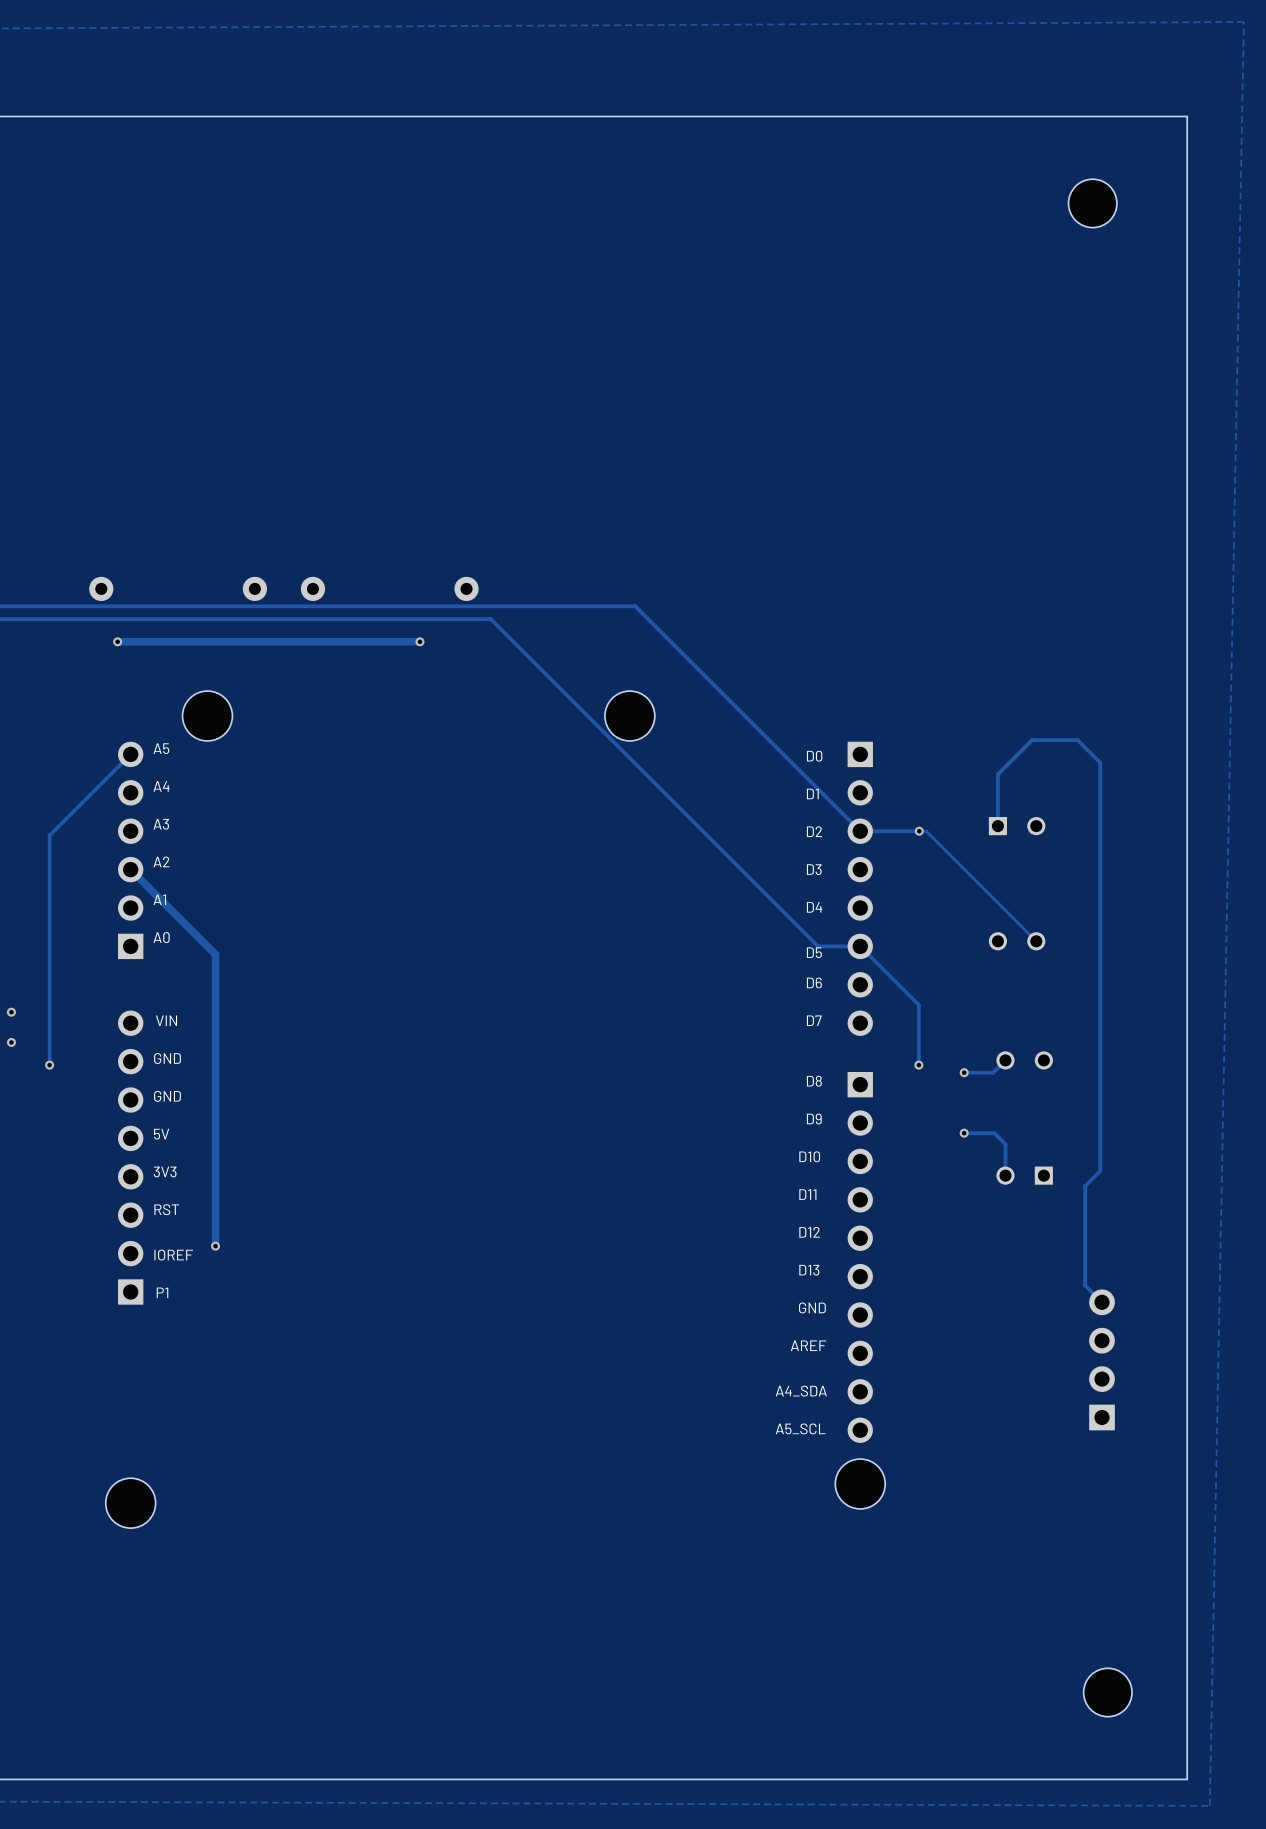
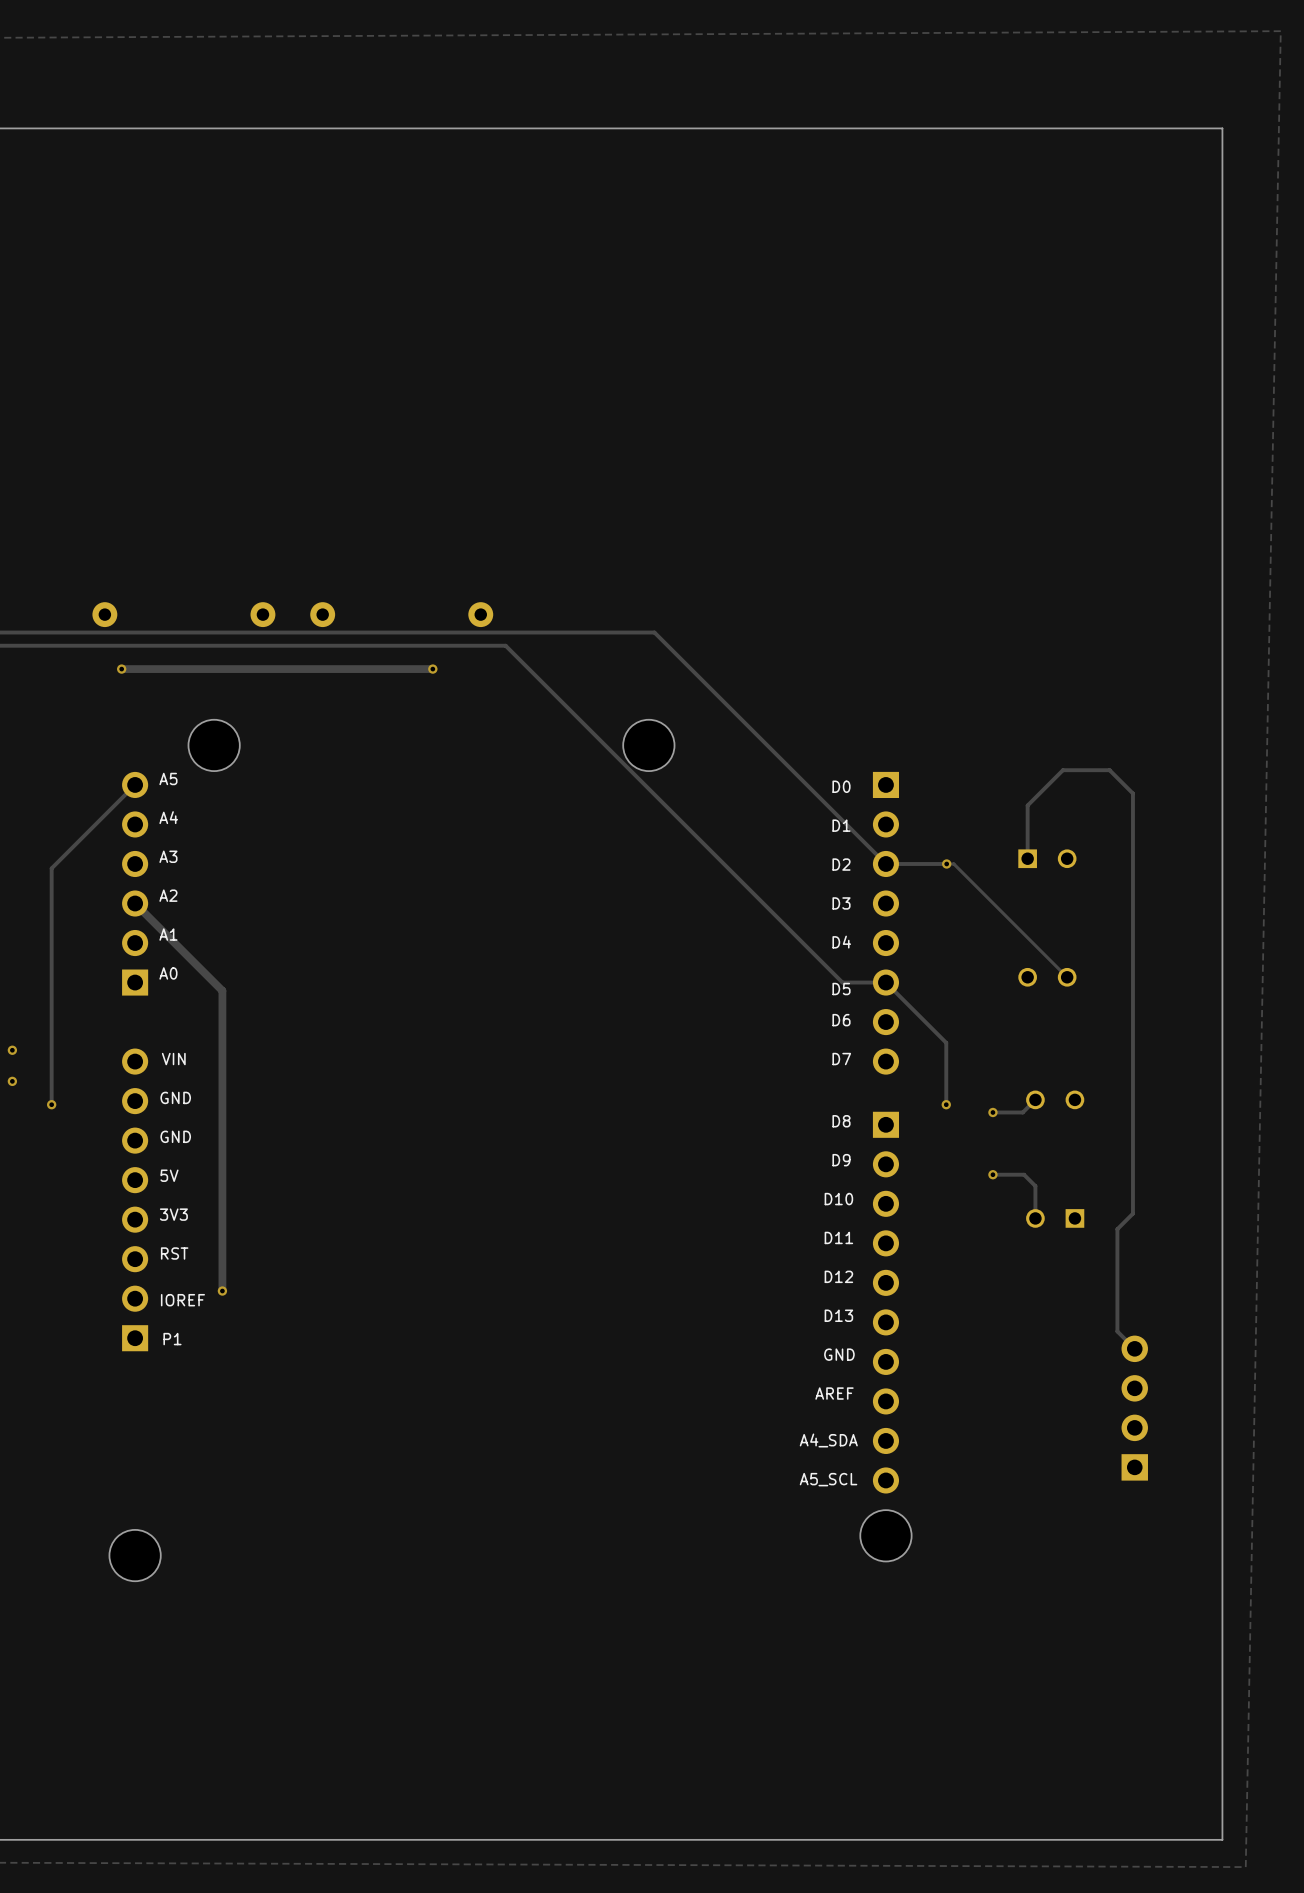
part: (1092, 203) -> none
part: (1107, 1692) -> none

